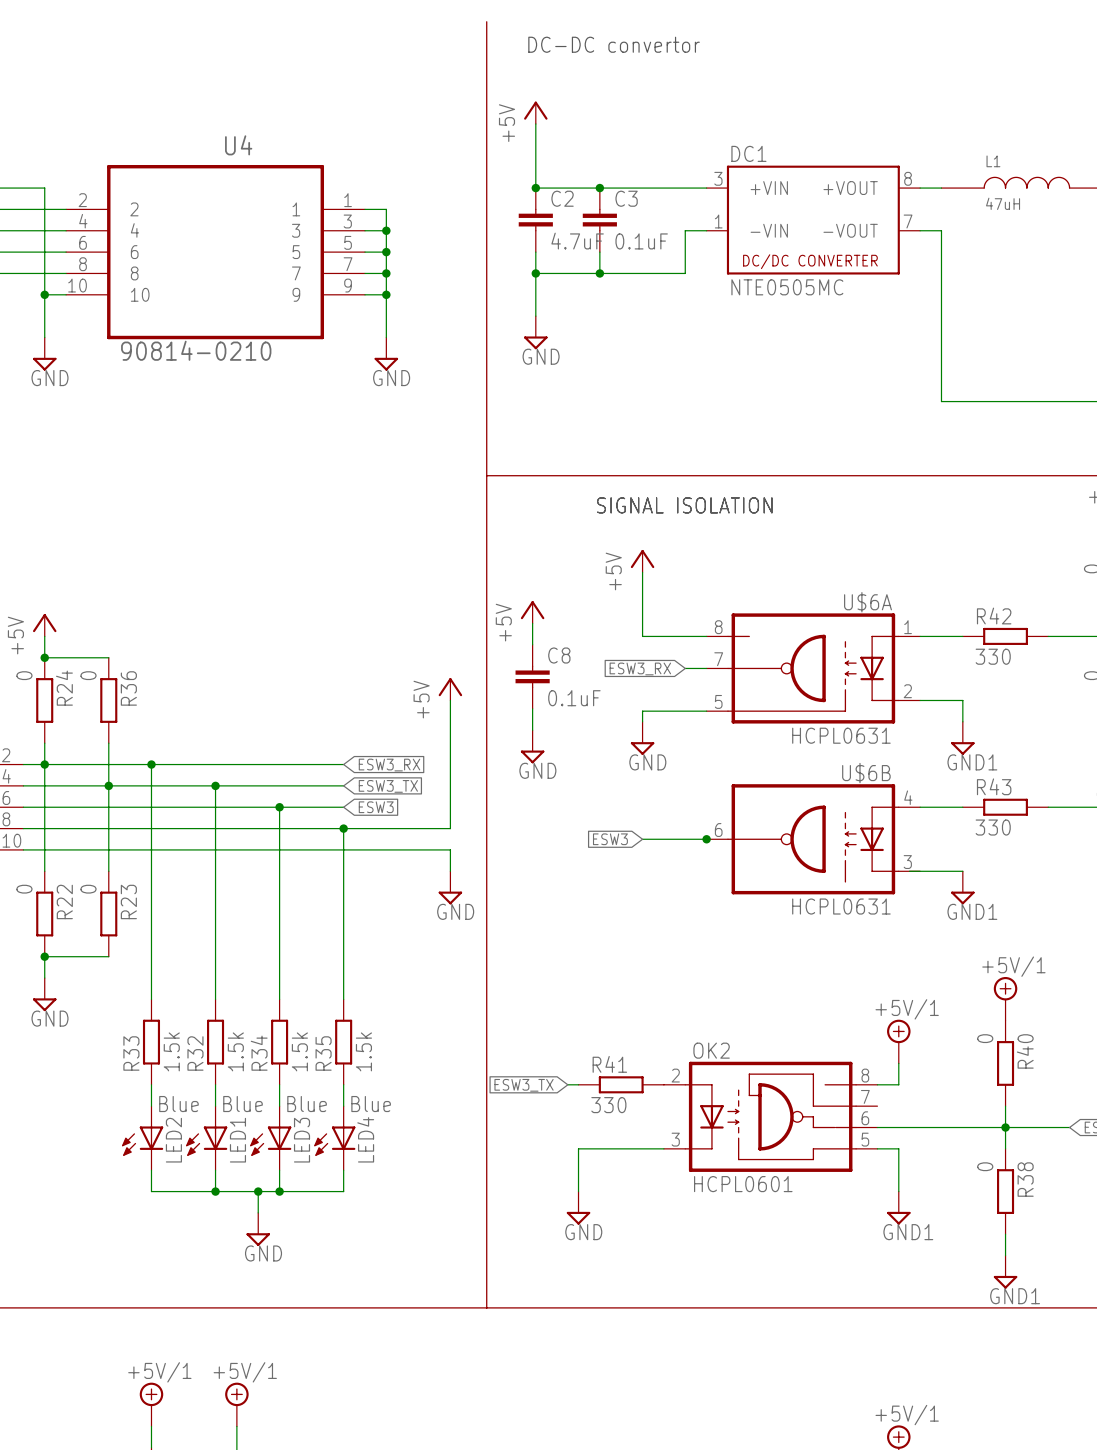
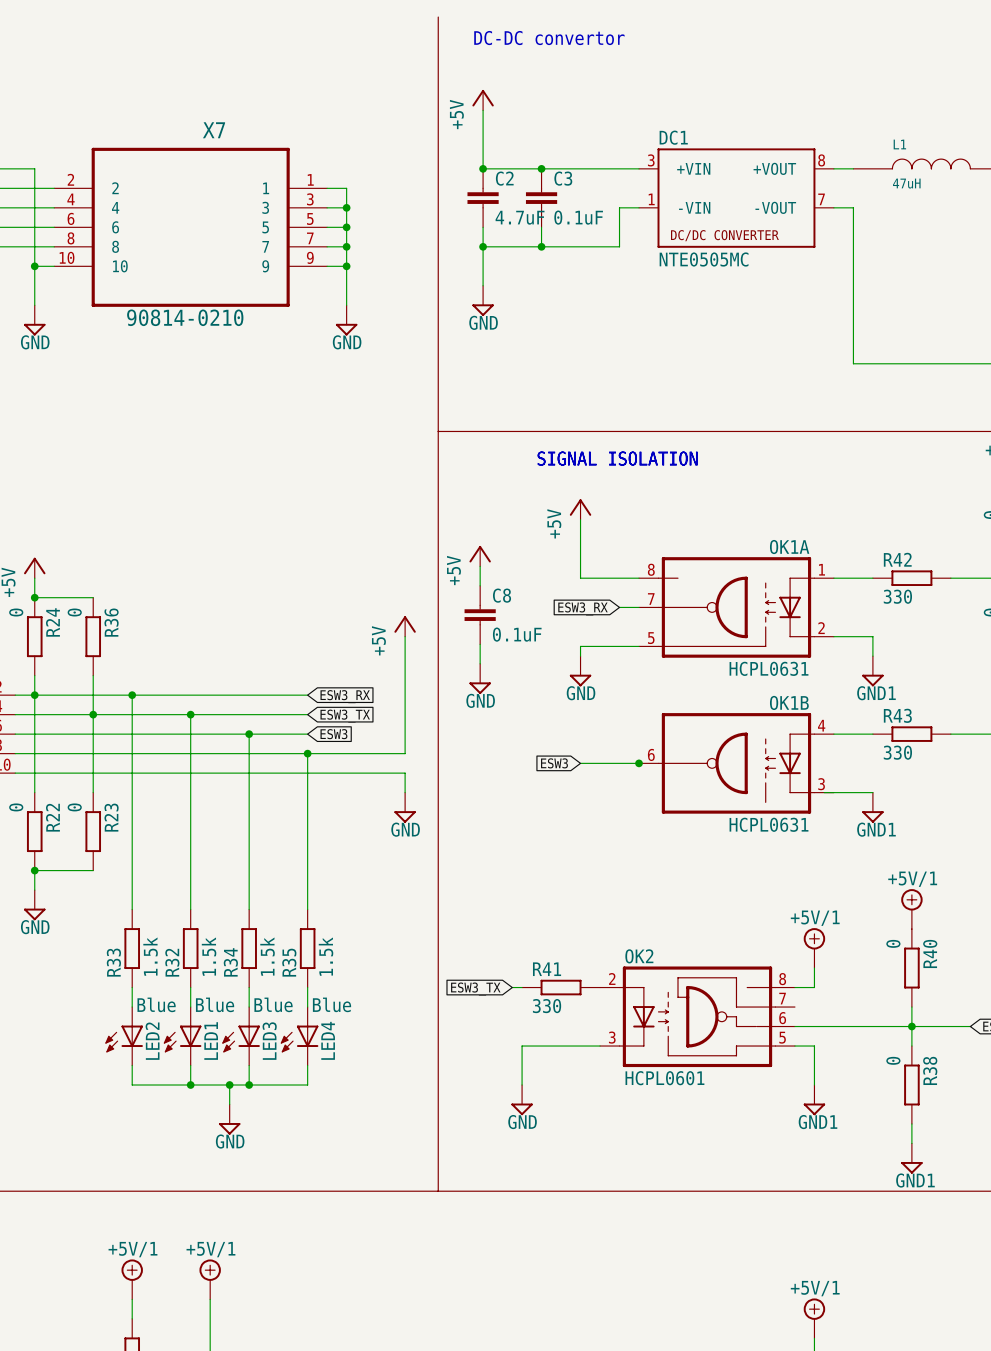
U4 name: U4 (238, 145) -> X7 (214, 130)
U$6A name: U$6A (868, 602) -> OK1A (789, 547)
U$6B name: U$6B (866, 773) -> OK1B (789, 702)

